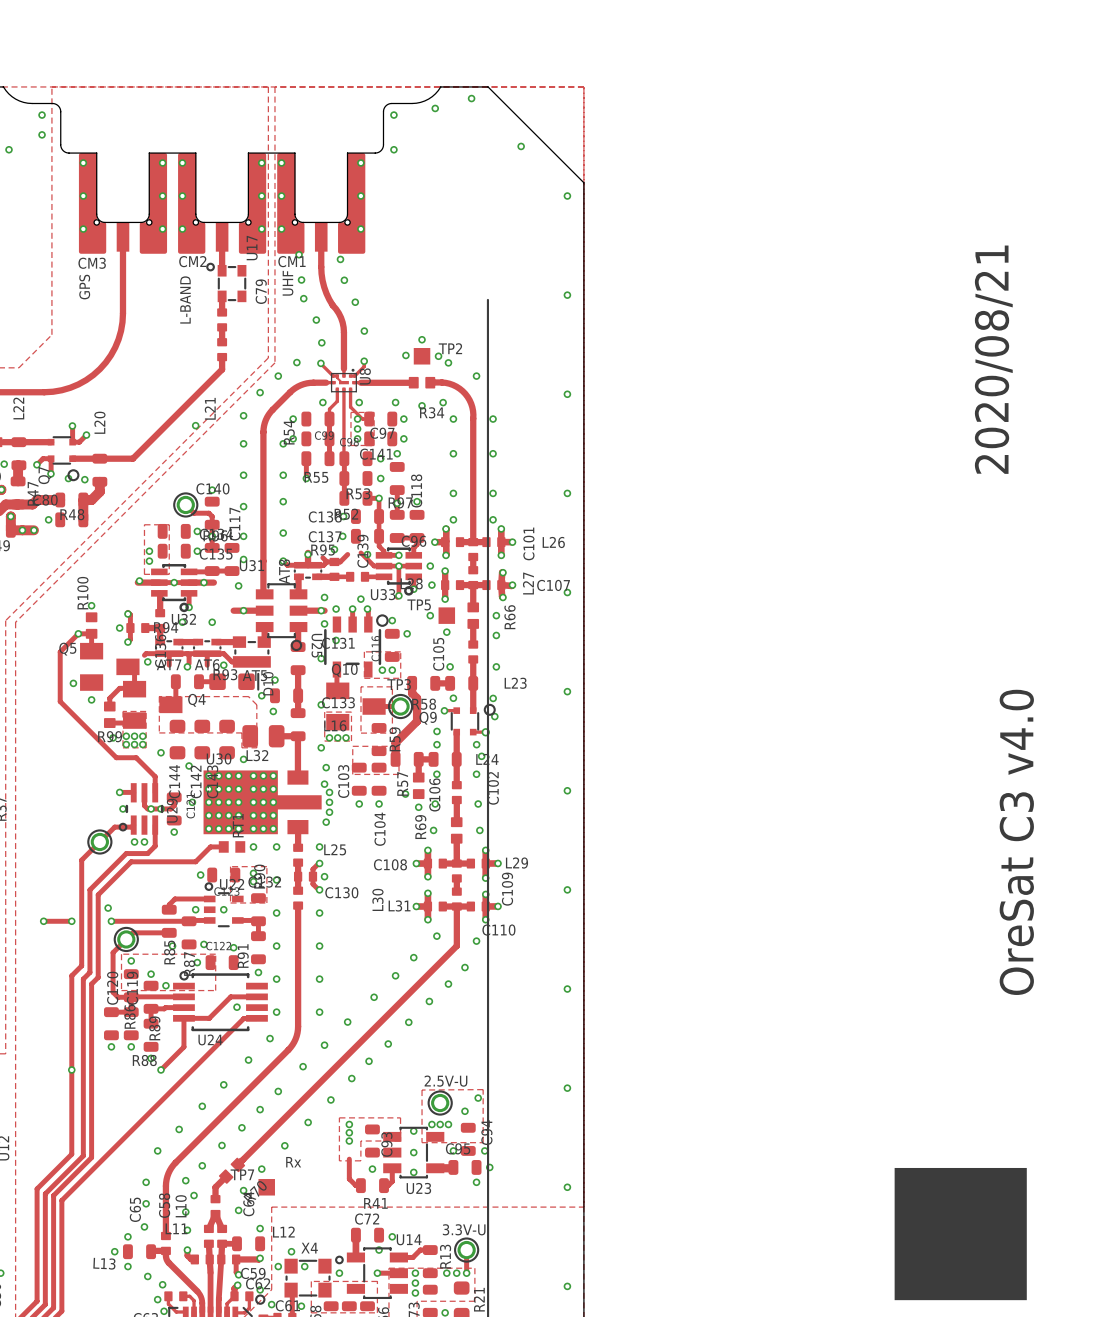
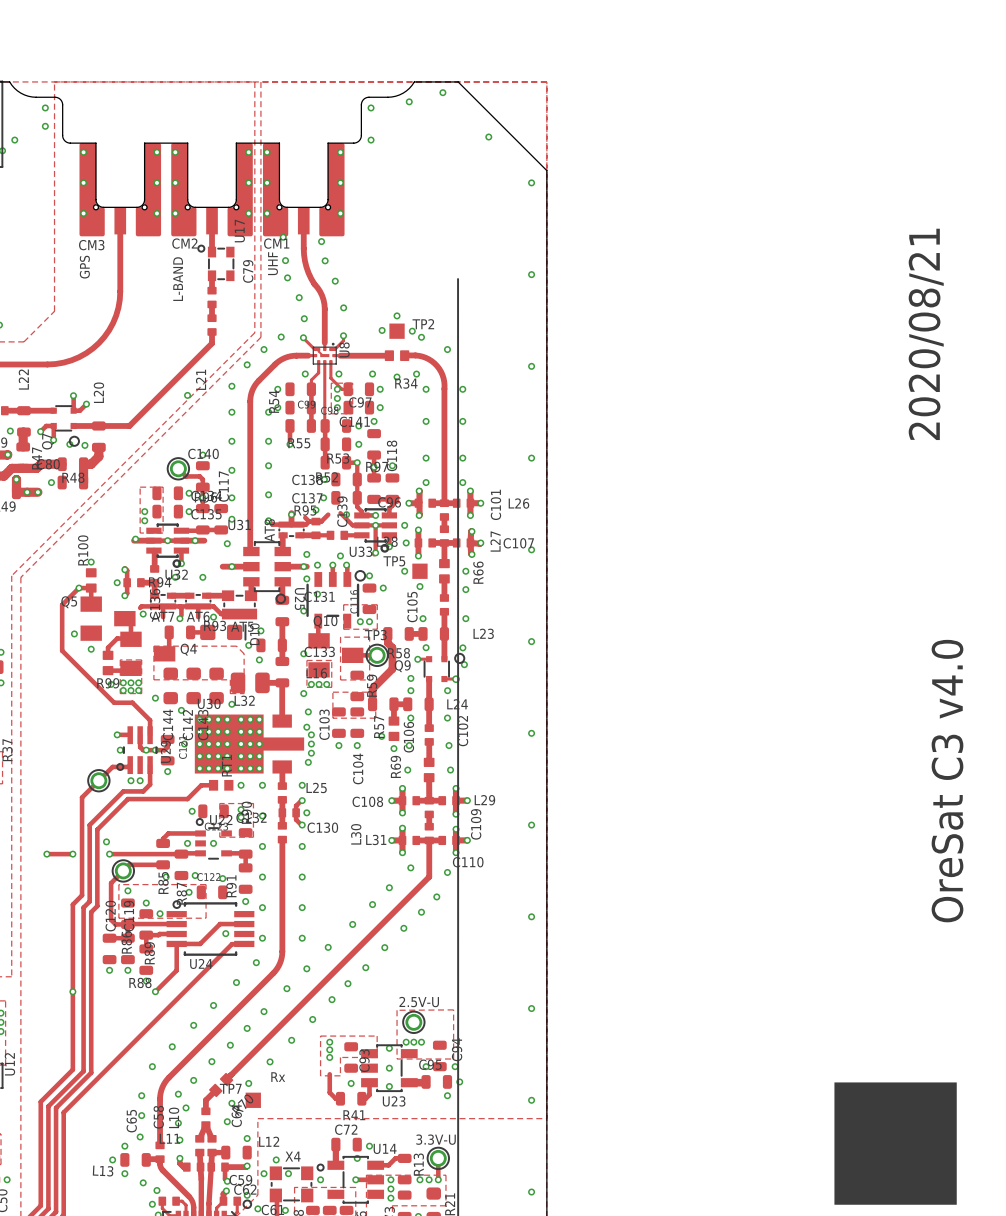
via: (481, 756) -> none
via: (478, 1098) -> none
via: (464, 1111) -> none

